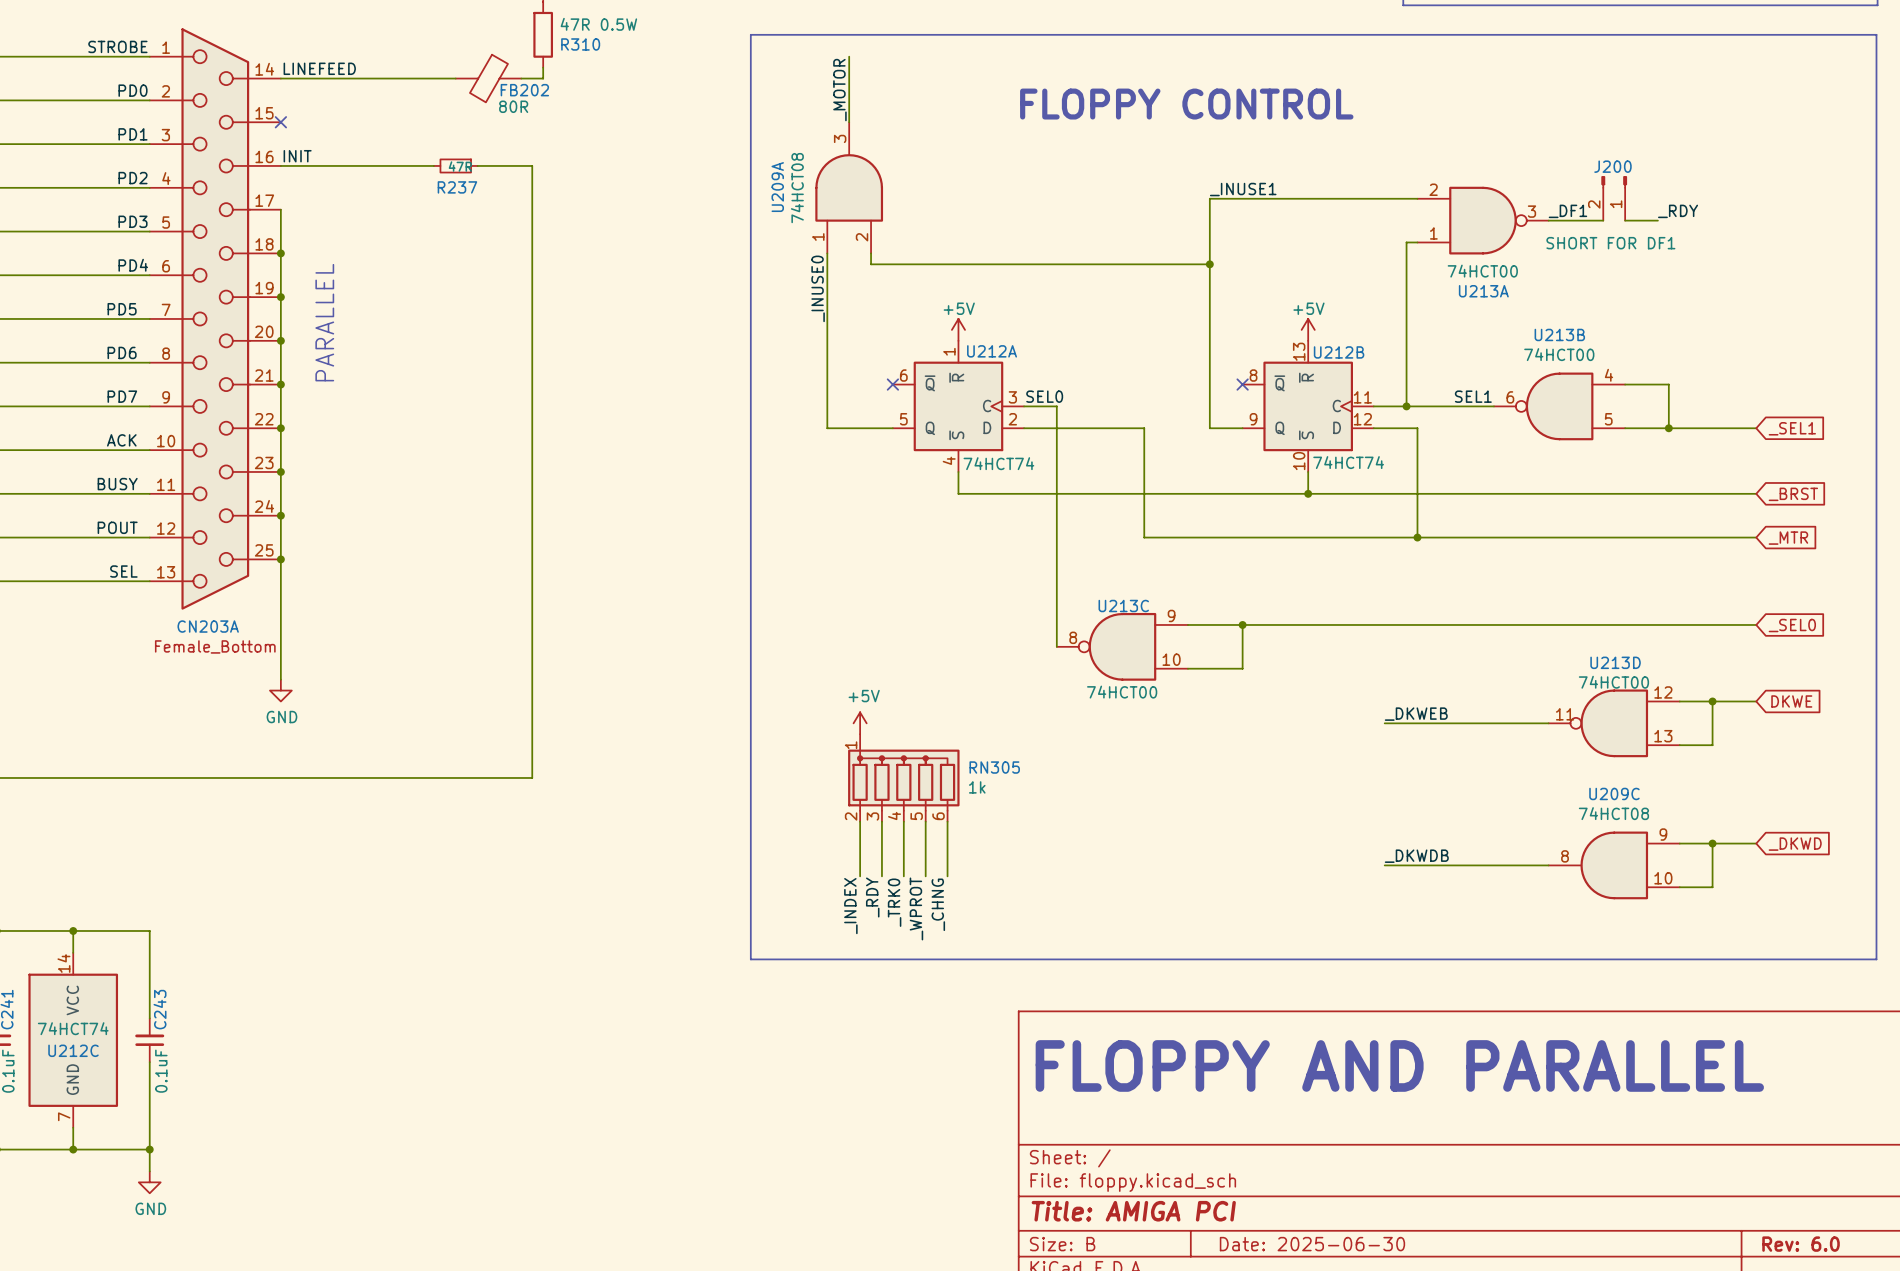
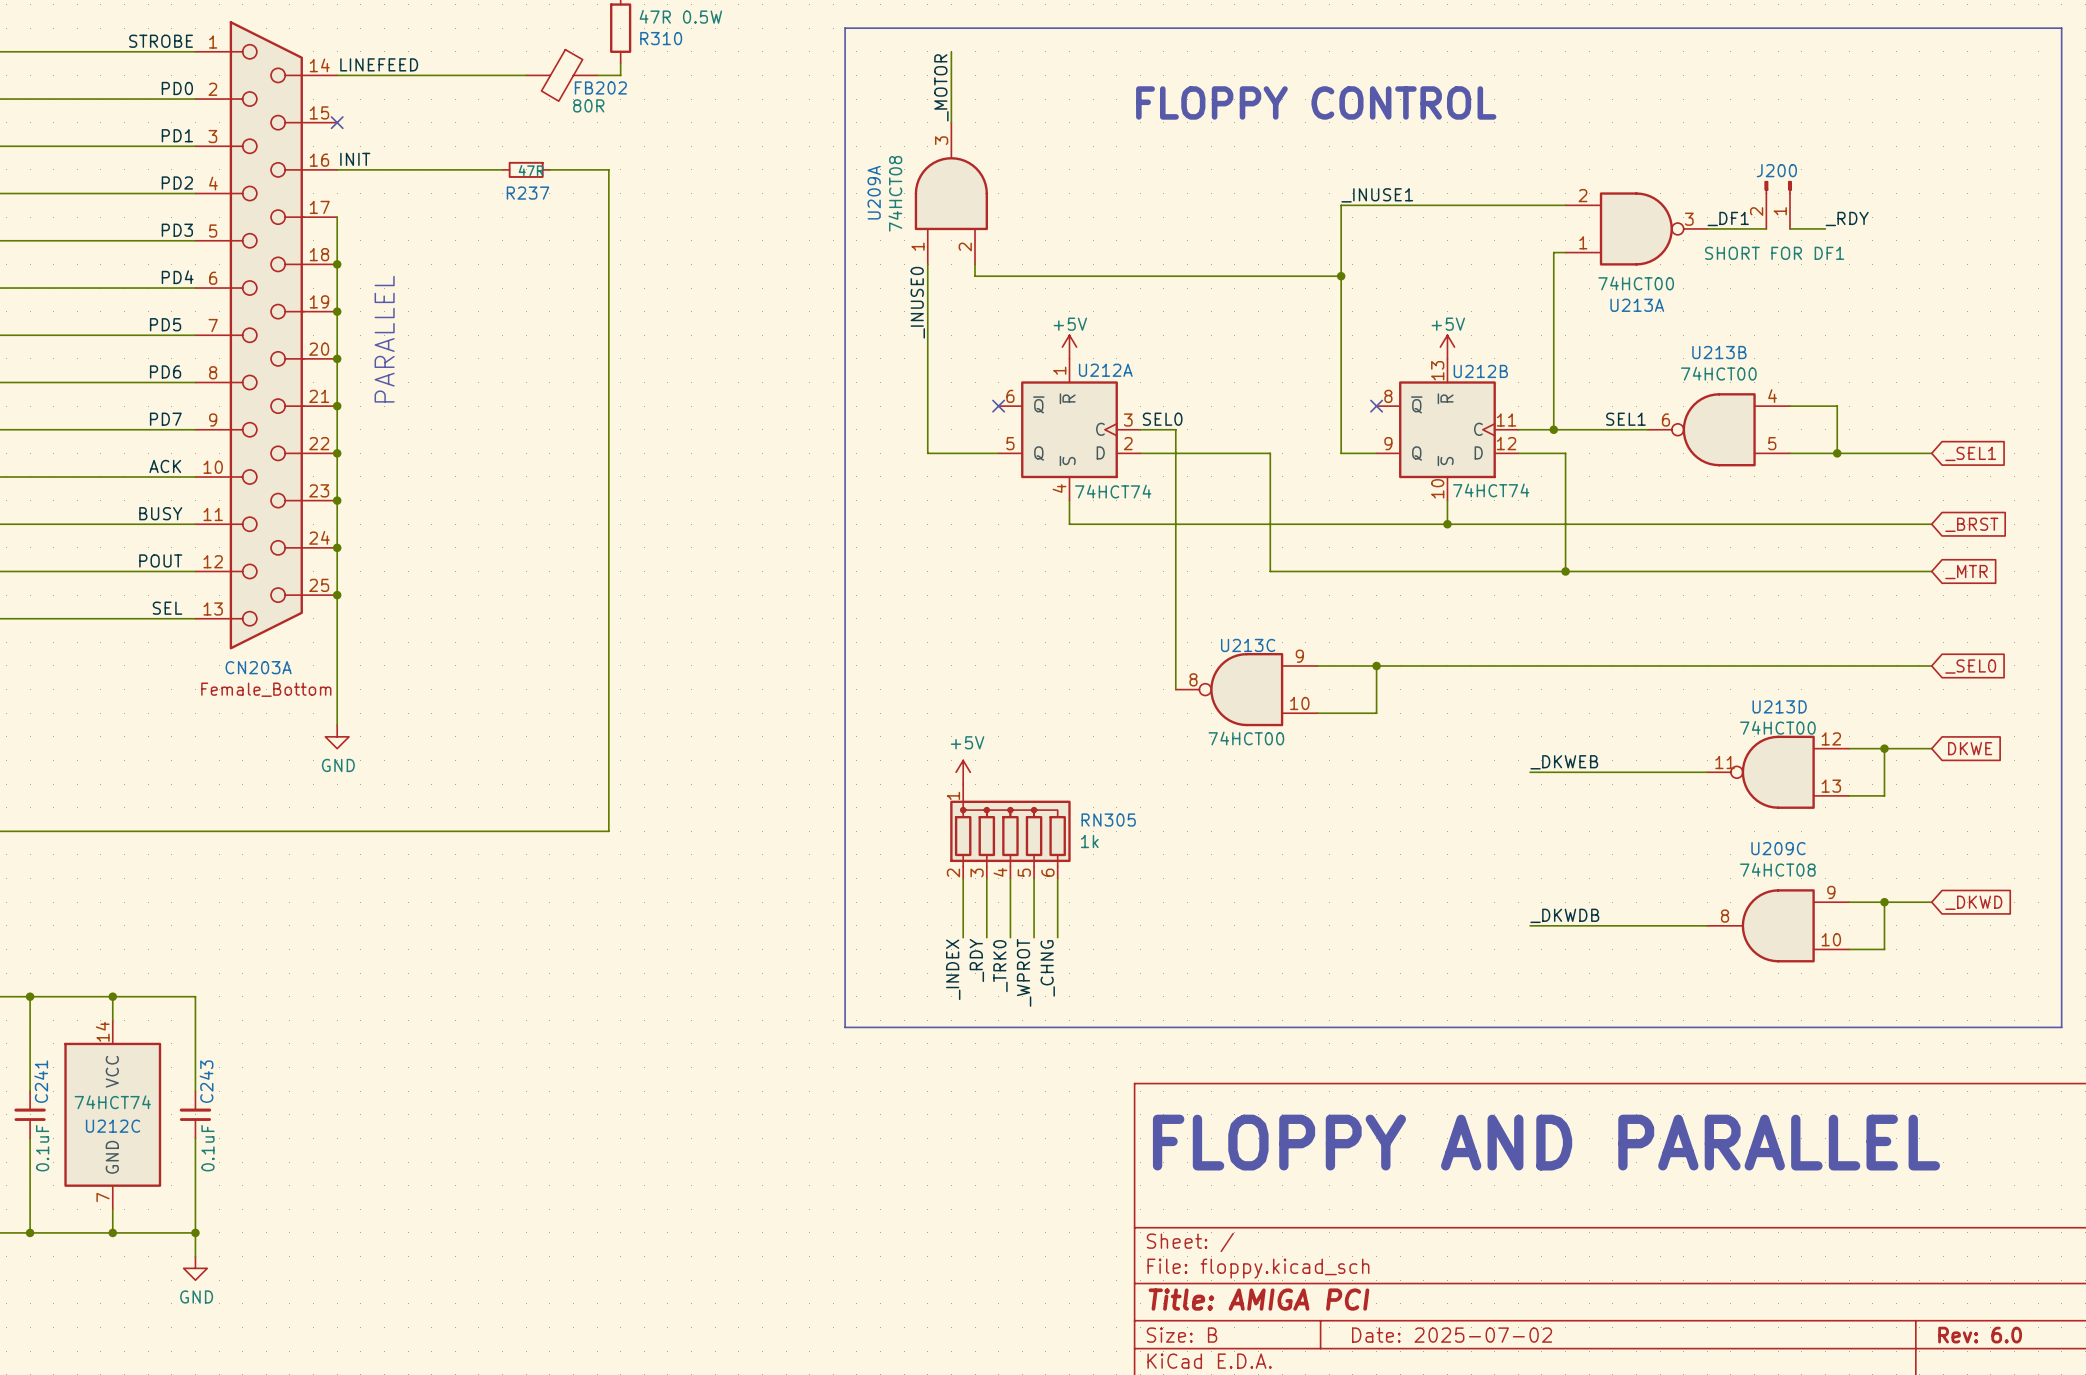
title block: Date: 2025-06-30 (1312, 1244) -> Date: 2025-07-02 (1452, 1335)

